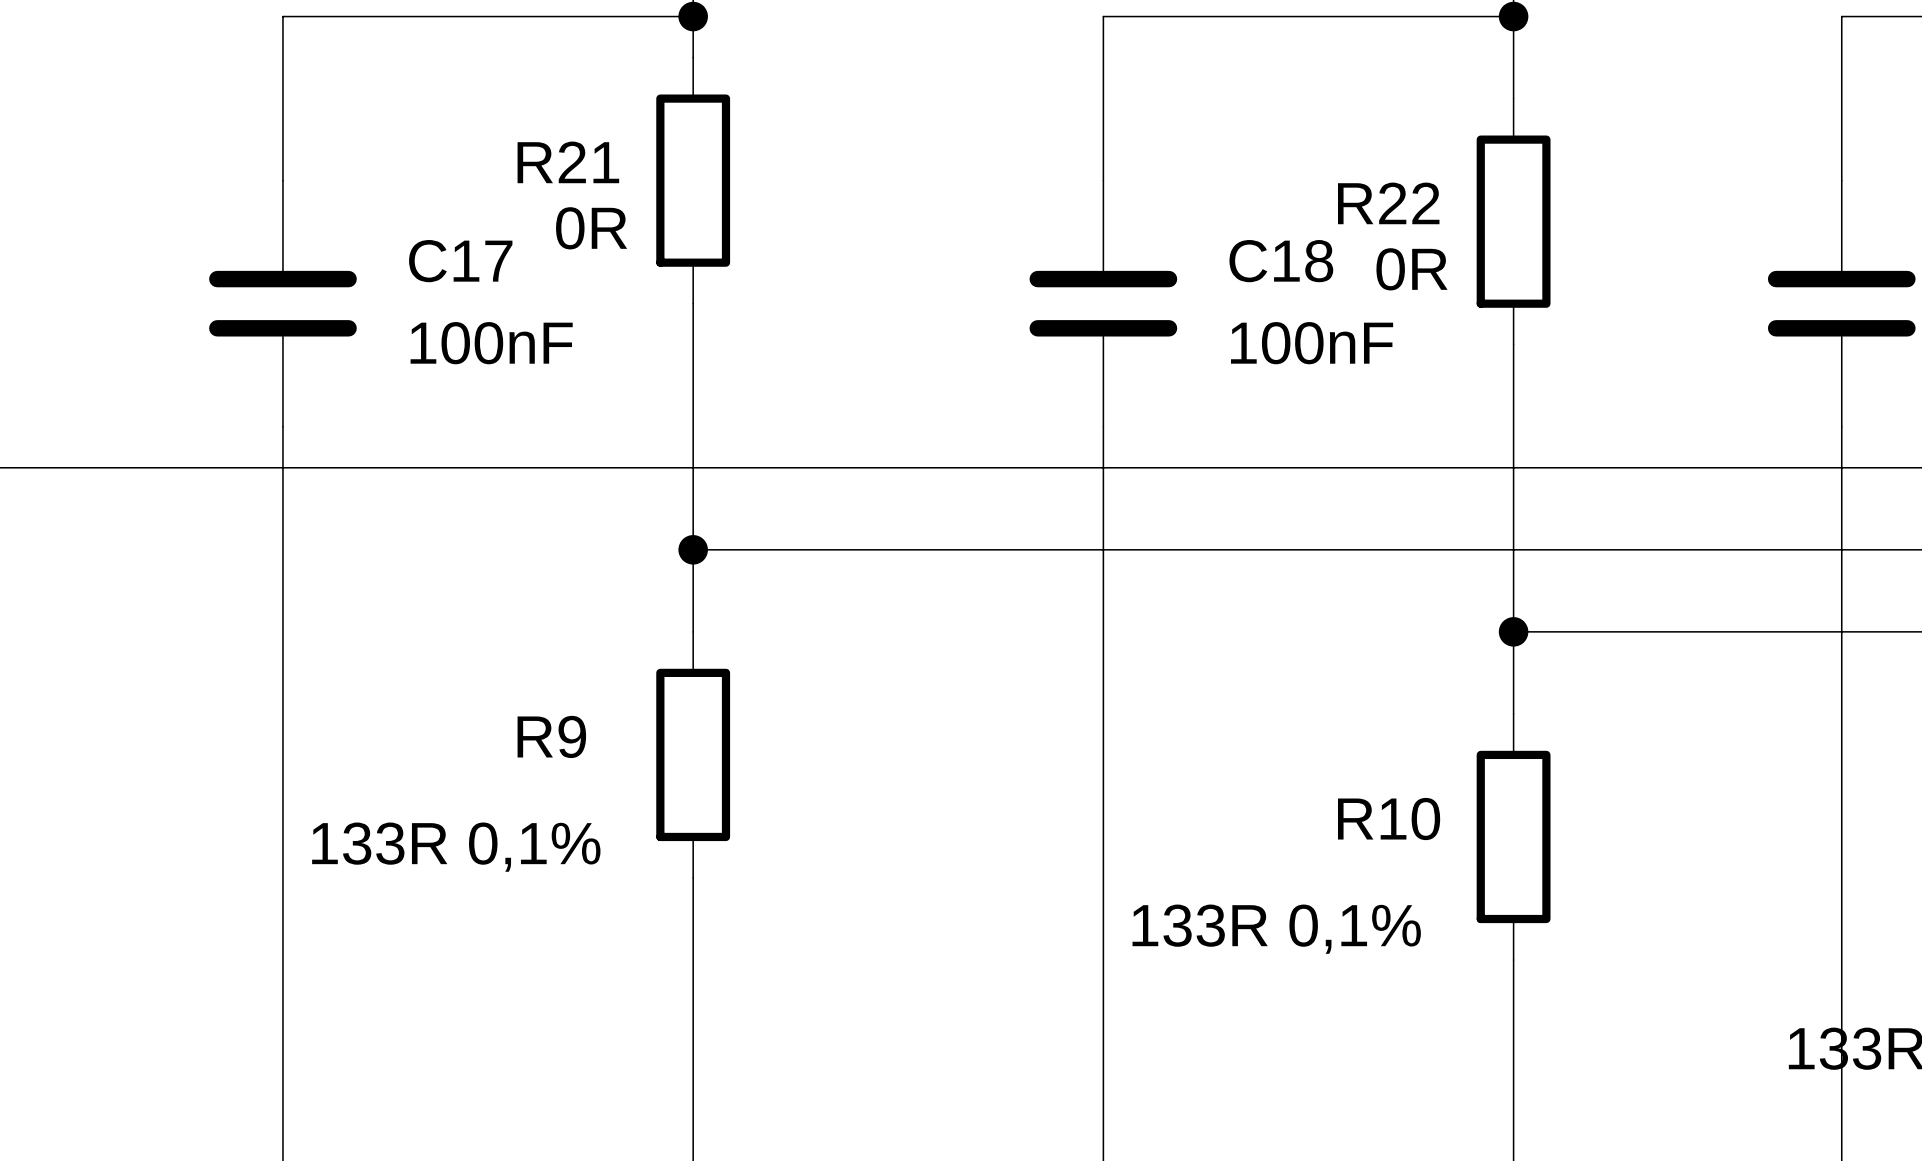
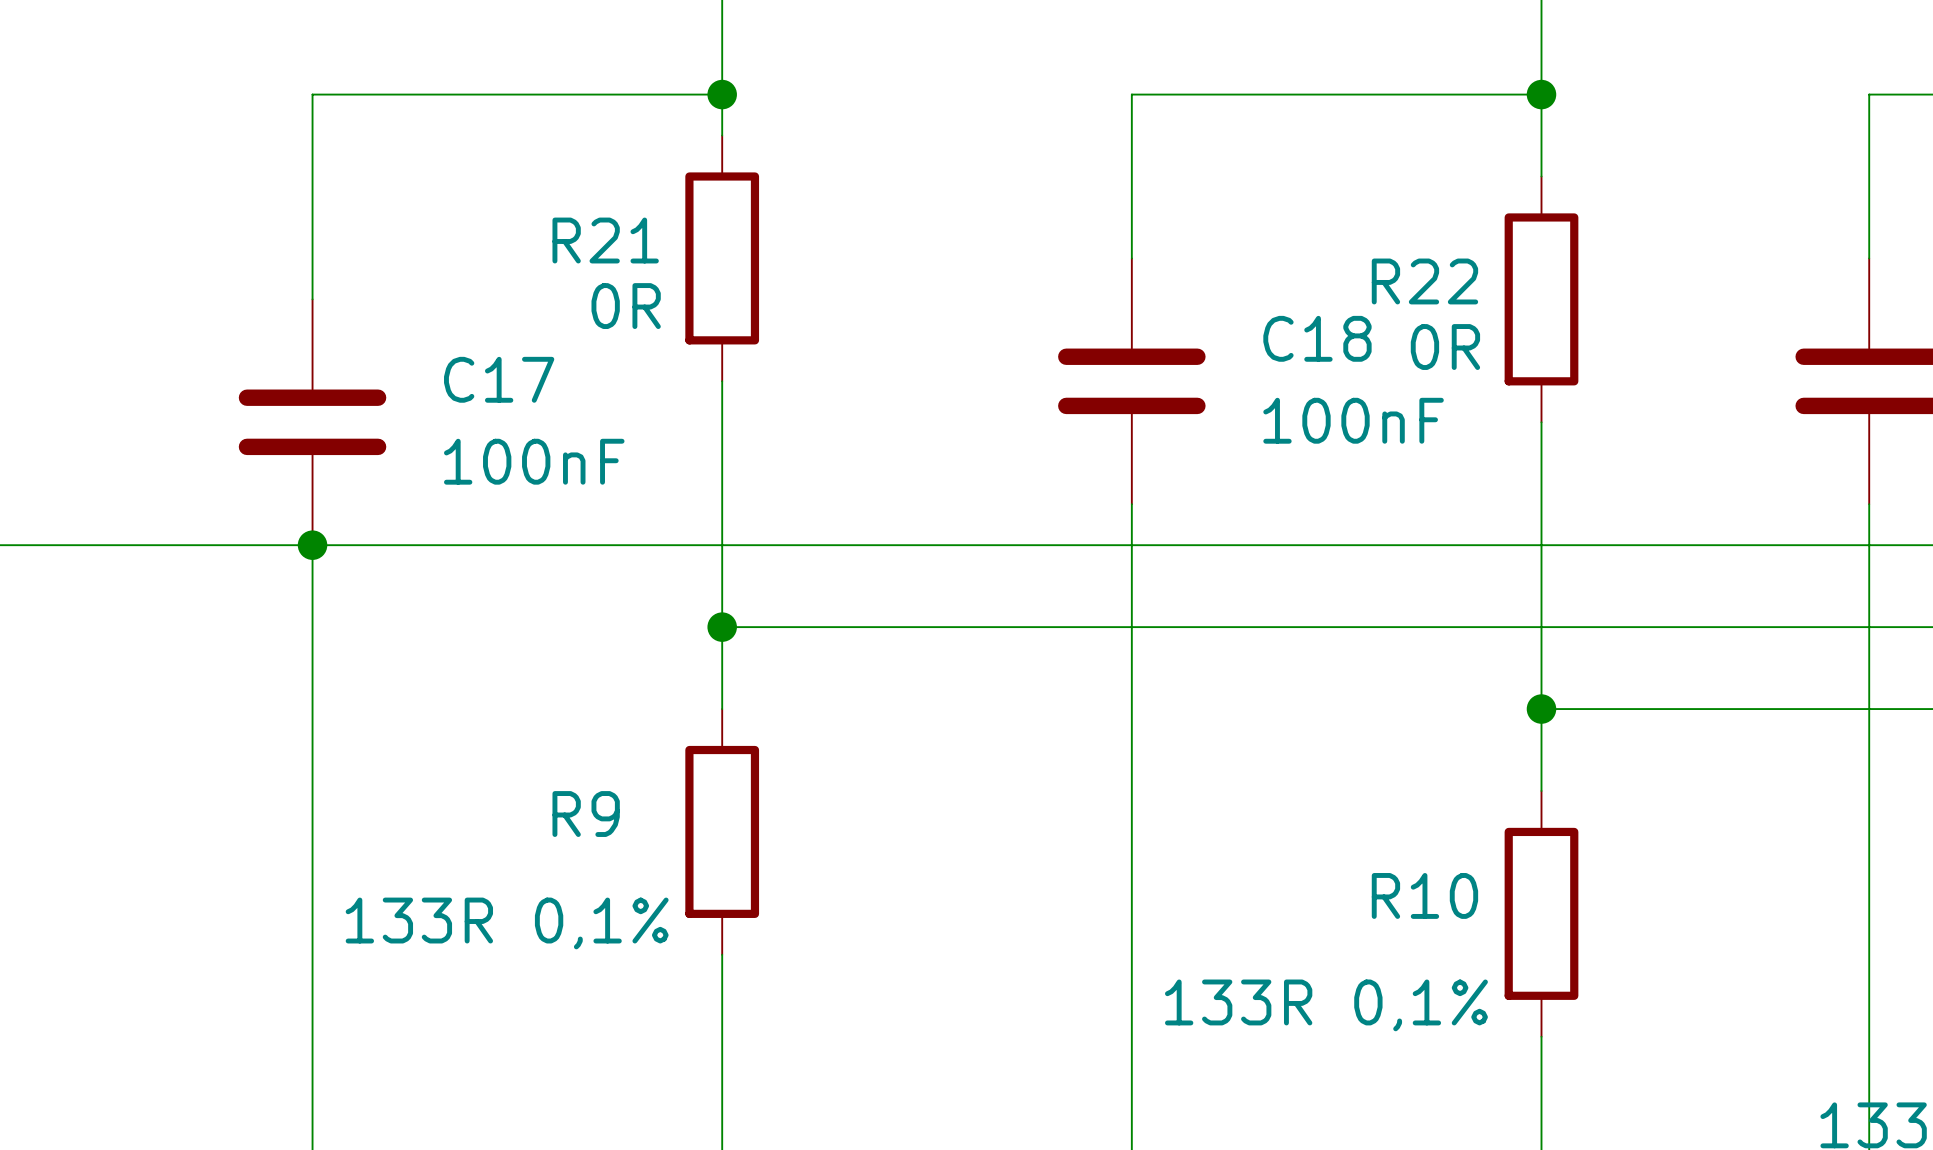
C17 position: (282, 303) -> (312, 422)
junction: none -> (312, 545)

